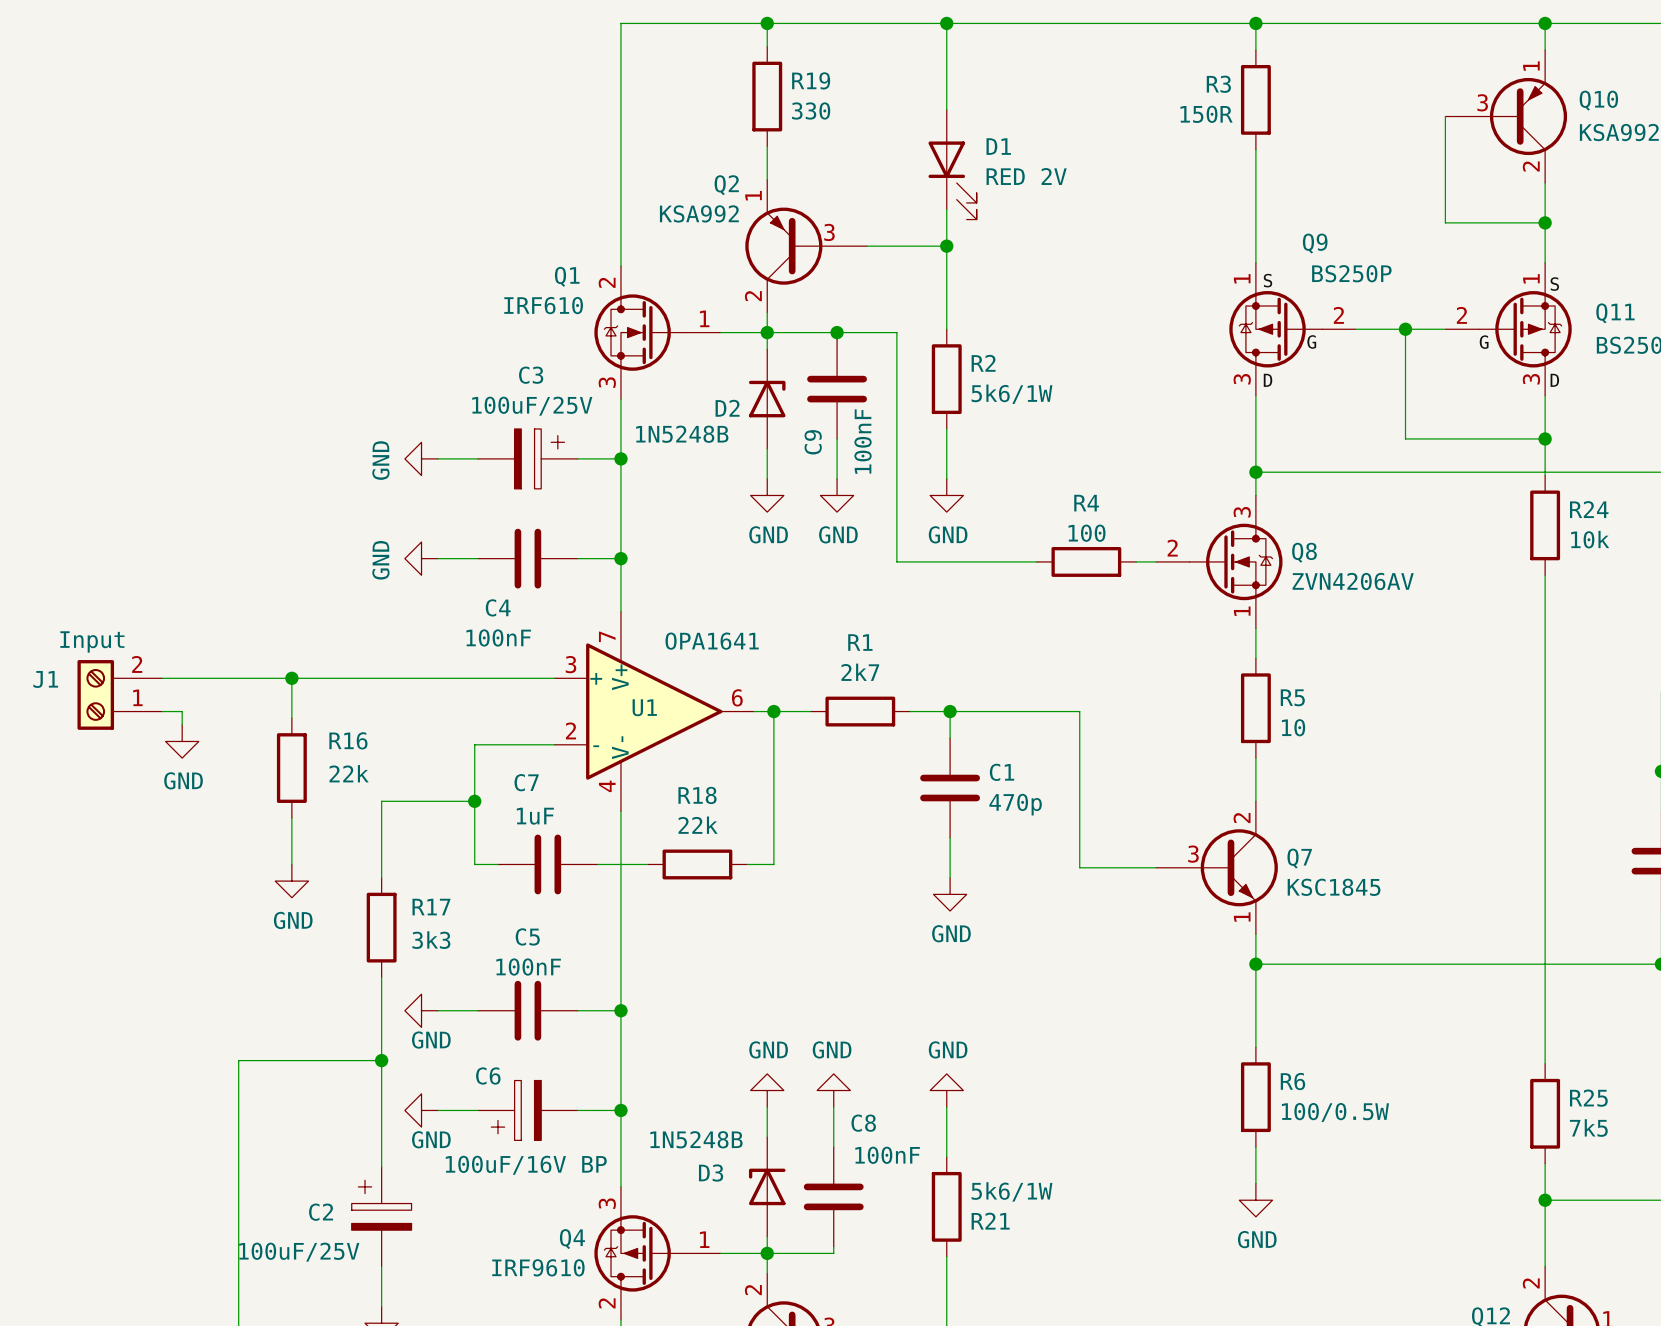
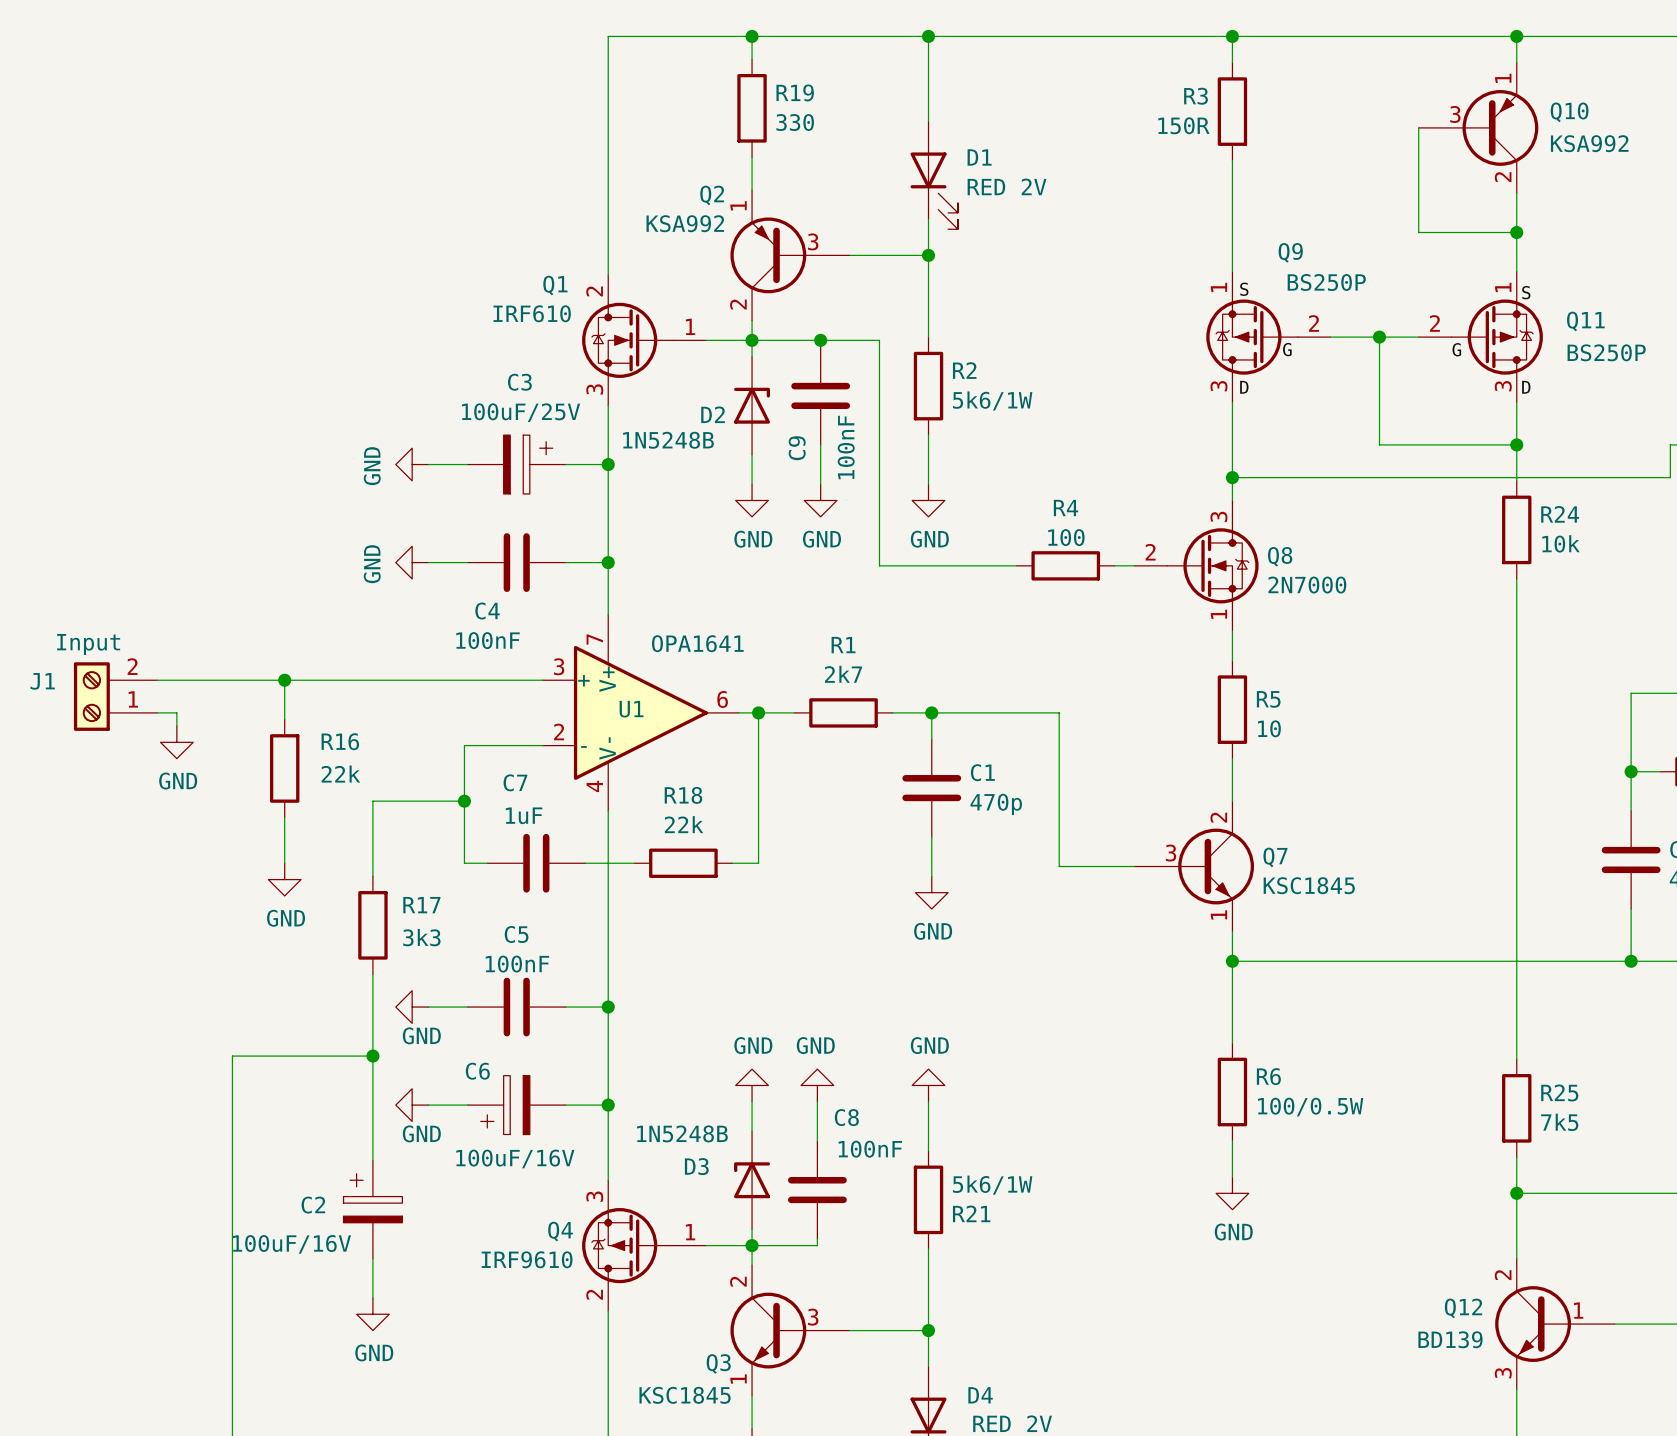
Q8 value: ZVN4206AV (1353, 581) -> 2N7000 (1307, 585)
C6 value: 100uF/16V BP (526, 1165) -> 100uF/16V (515, 1158)
C2 value: 100uF/25V (299, 1252) -> 100uF/16V (291, 1244)

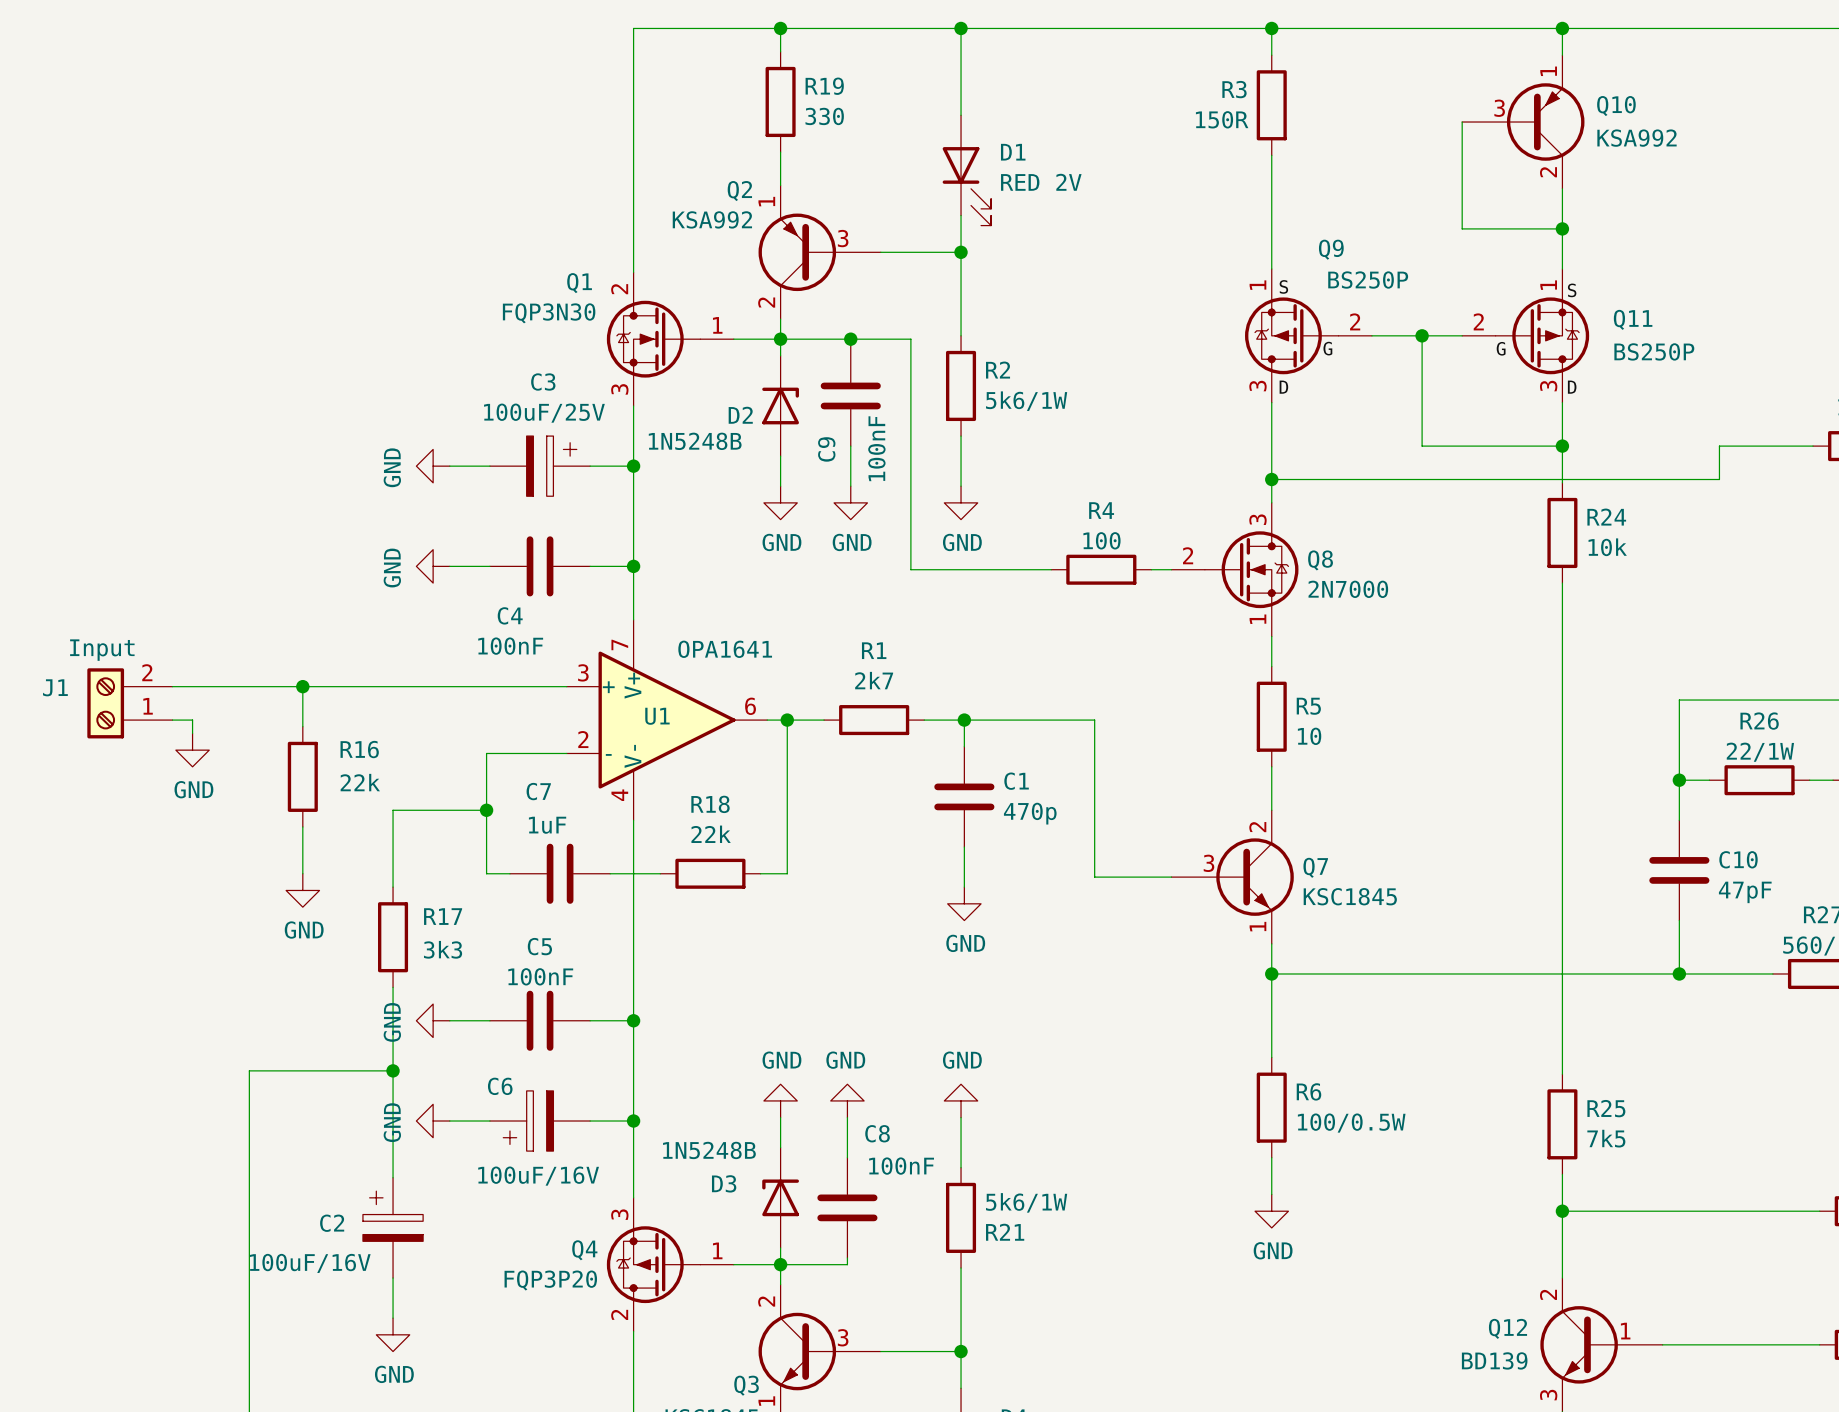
Q1 value: IRF610 (532, 313) -> FQP3N30 (549, 313)
power symbol text rotation: 0° (421, 1035) -> 90° counterclockwise (392, 1022)
power symbol text rotation: 0° (421, 1133) -> 90° counterclockwise (392, 1122)
Q4 value: IRF9610 (527, 1259) -> FQP3P20 (550, 1280)

